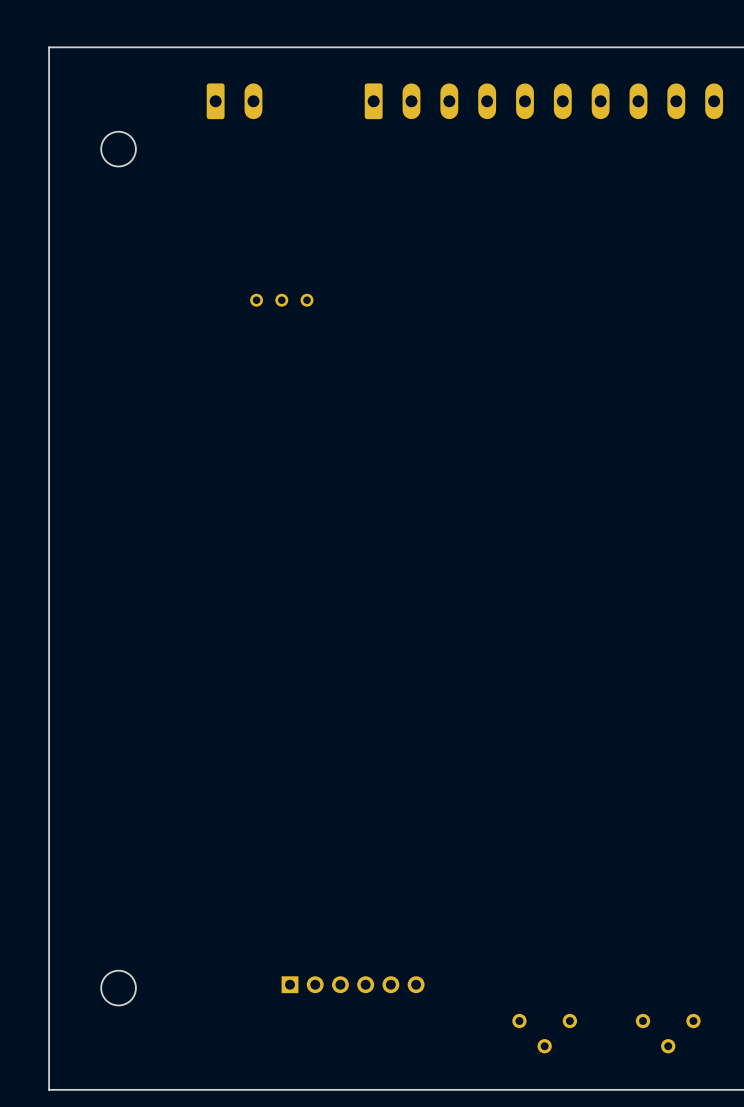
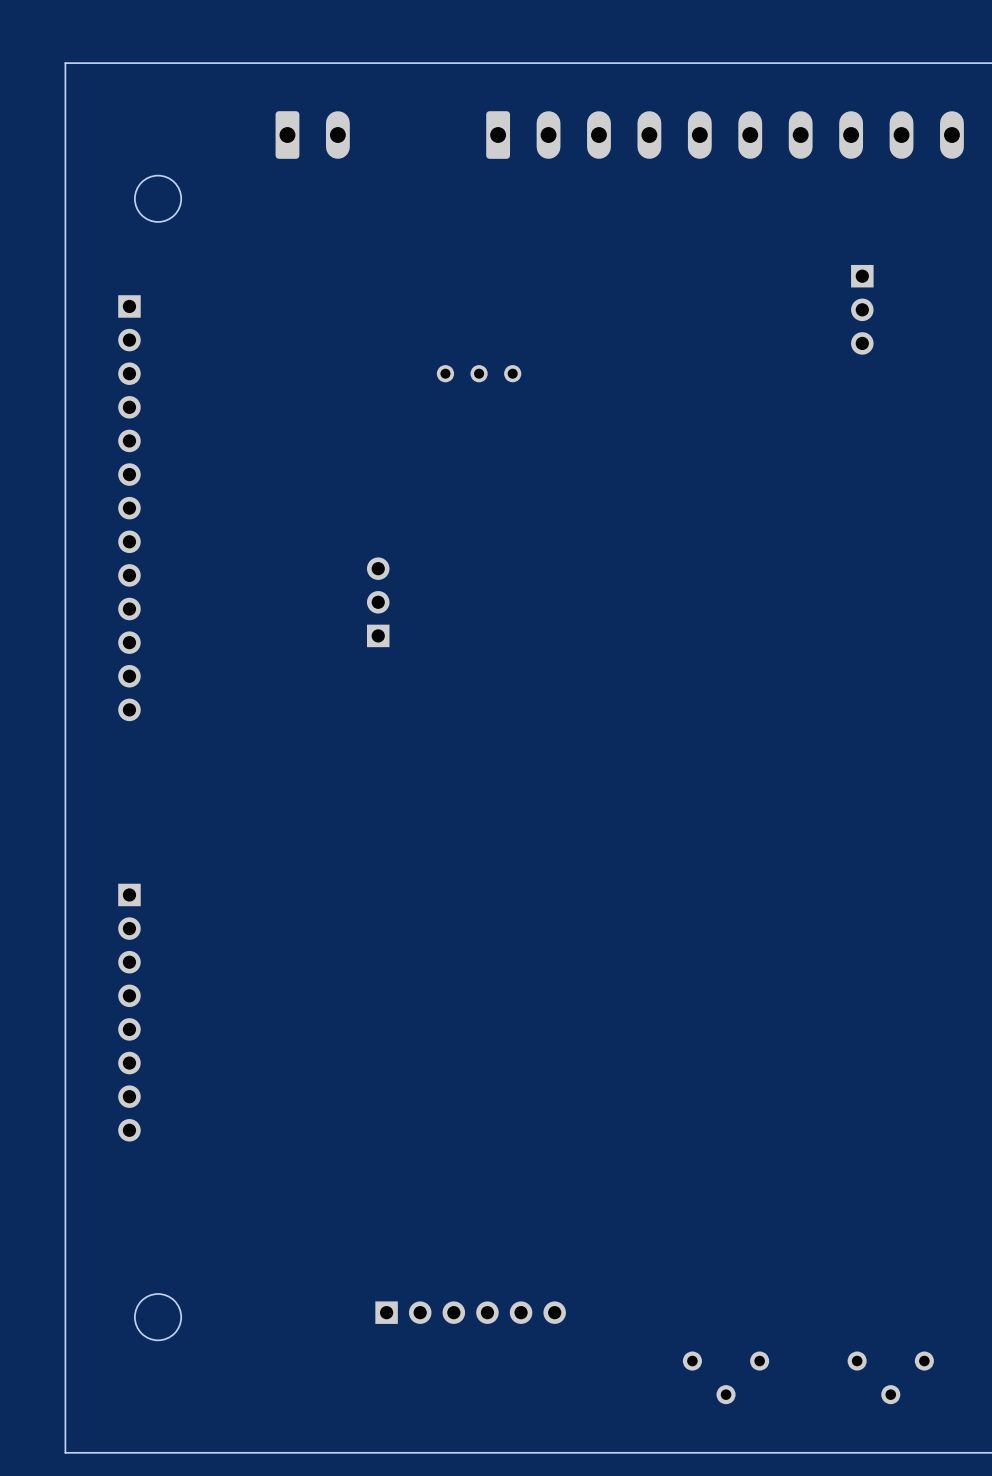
part: none -> (862, 309)
part position: (281, 300) -> (479, 373)
part: none -> (129, 508)
part: none -> (378, 602)
part: none -> (129, 1012)

